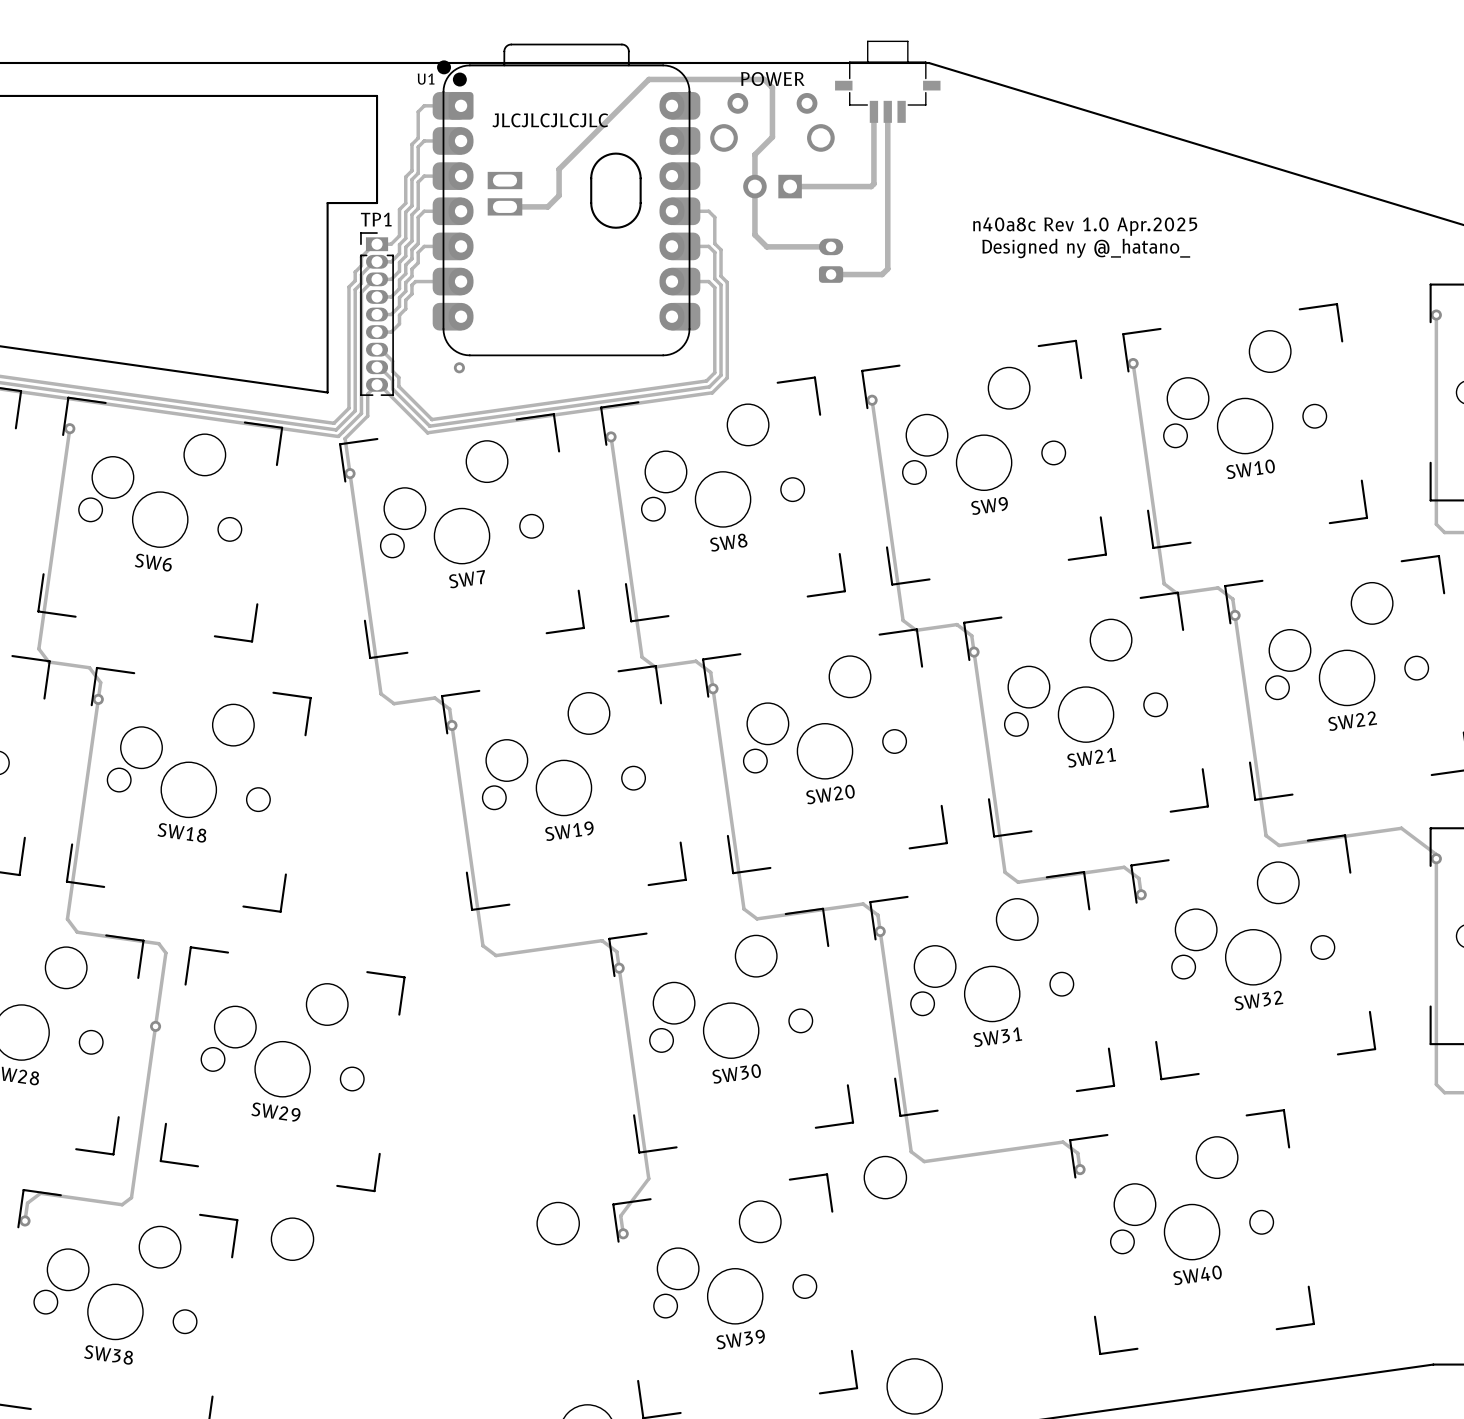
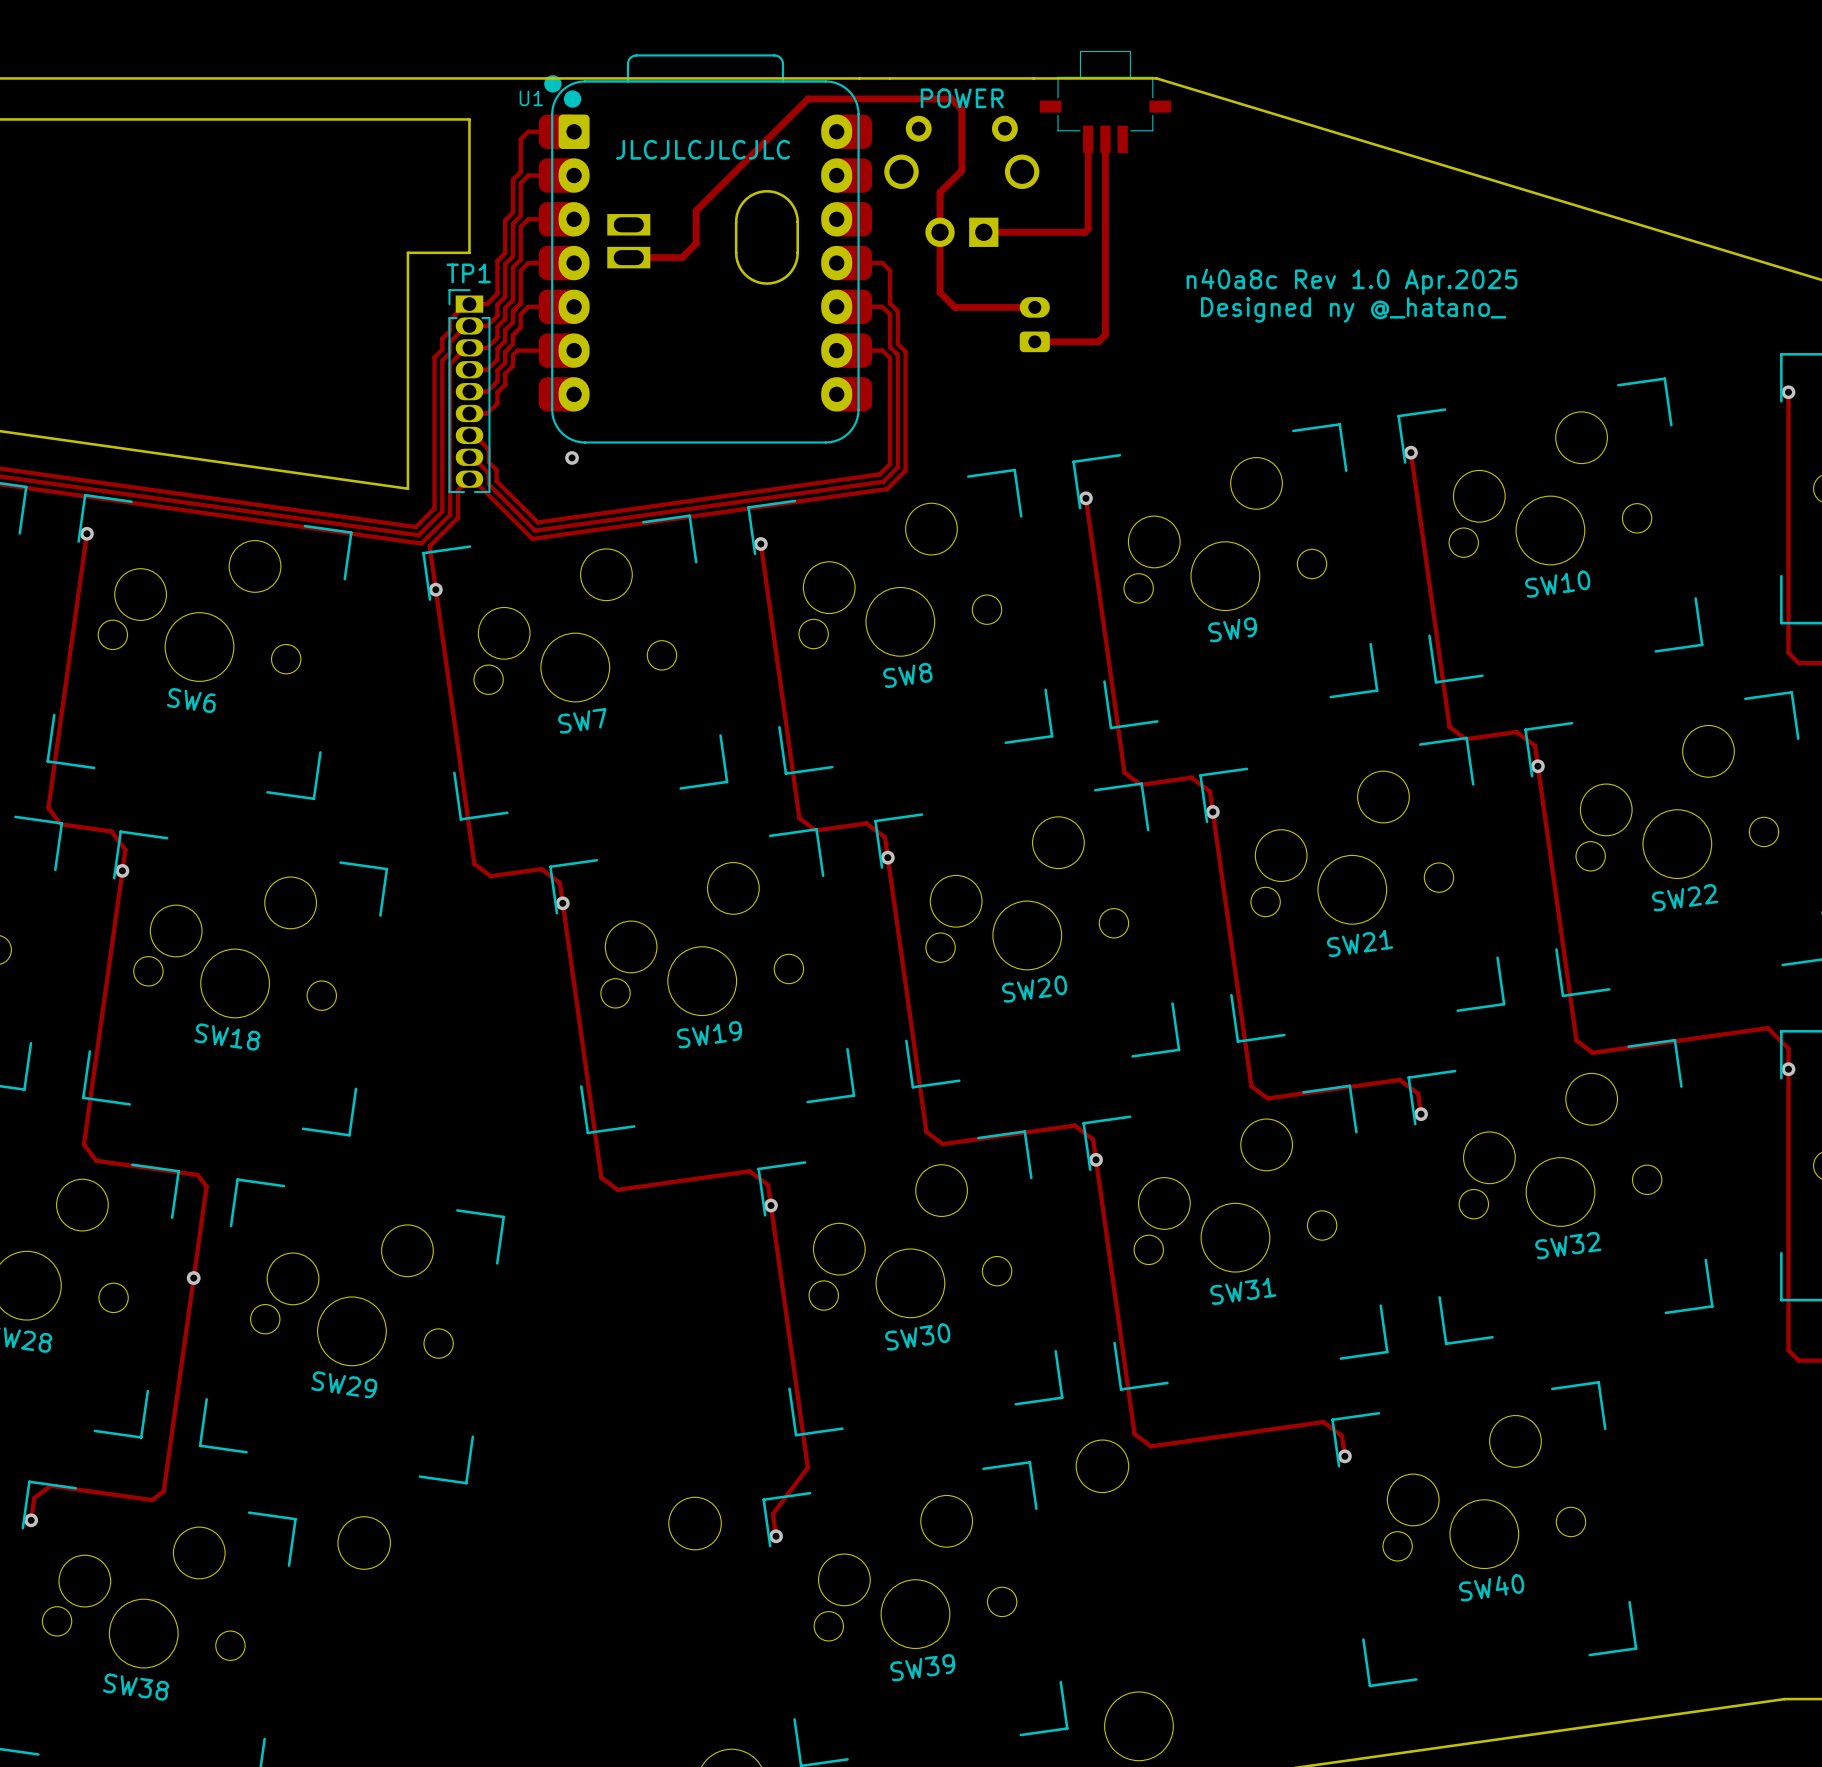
track: none -> (1767, 1028) (1788, 1048) (1788, 1069)
track: (1401, 828) (1435, 854) -> (1745, 1031) (1767, 1028)

